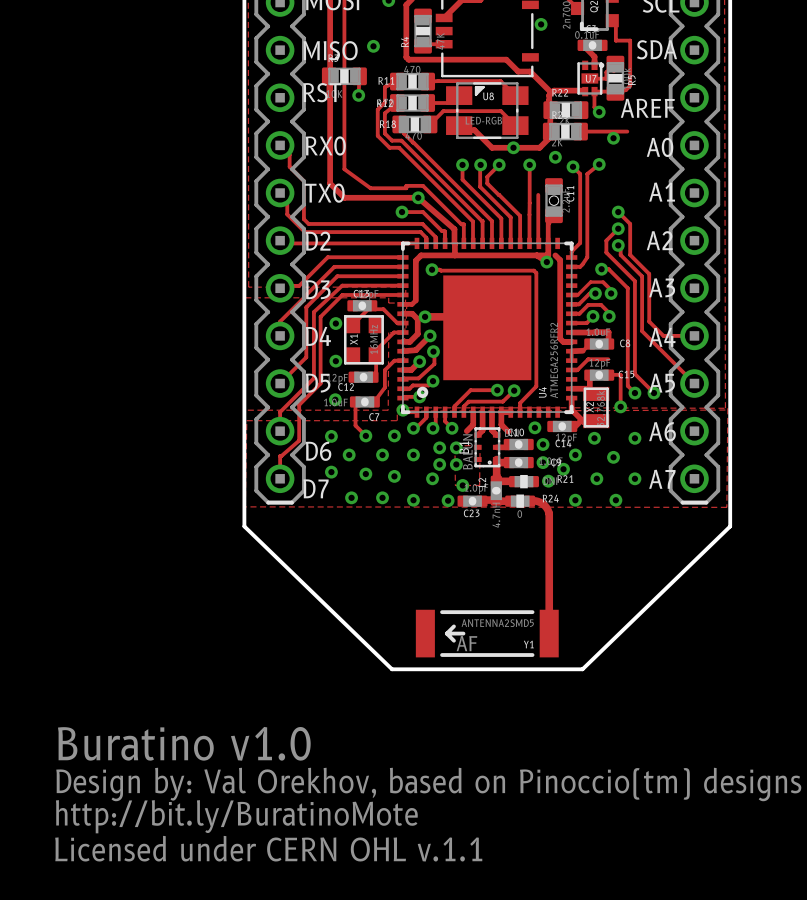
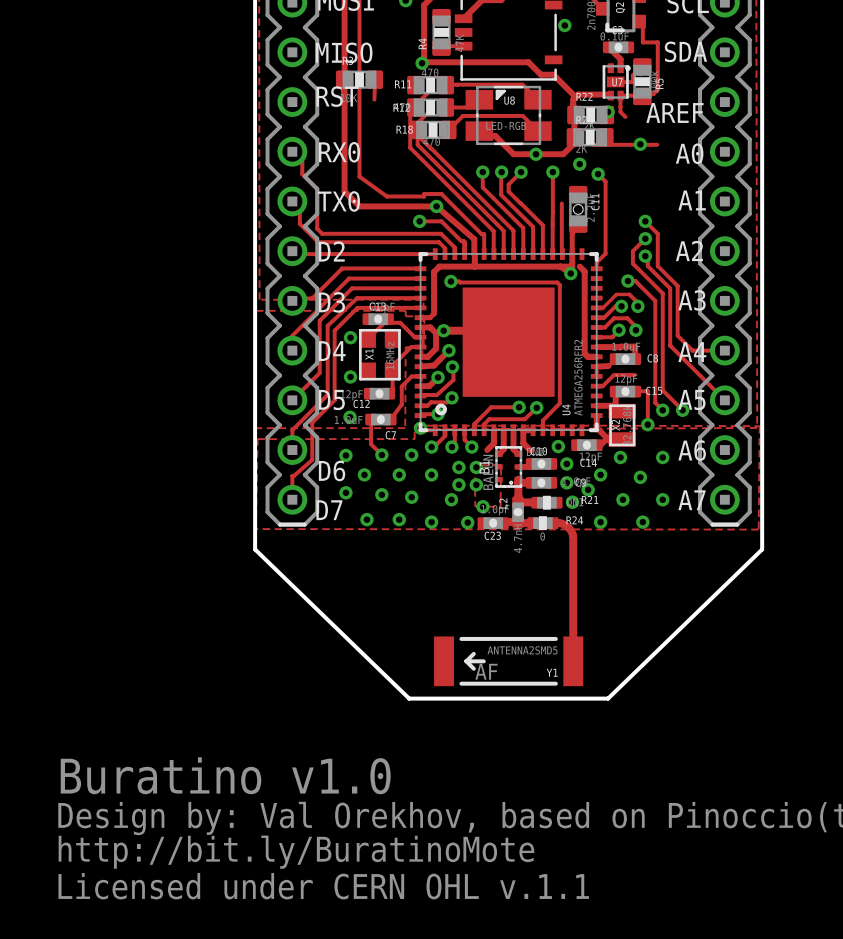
via: (373, 46) -> none
via: none -> (422, 63)
track: (397, 81) (384, 87) (384, 102) (377, 109) (377, 135) (389, 147) (399, 147) -> (433, 87) (410, 110) (410, 147) (416, 154)
via: (358, 95) -> none
track: (397, 103) (384, 113) (384, 133) (392, 140) (401, 140) (482, 221) -> (433, 107) (417, 123) (417, 144) (503, 230)
via position: (599, 112) -> (608, 111)
track: (580, 131) (627, 131) -> none
track: none -> (592, 144) (657, 144)
track: (599, 164) (587, 173) (587, 257) (580, 266) (571, 266) -> none
via: (599, 164) -> none

